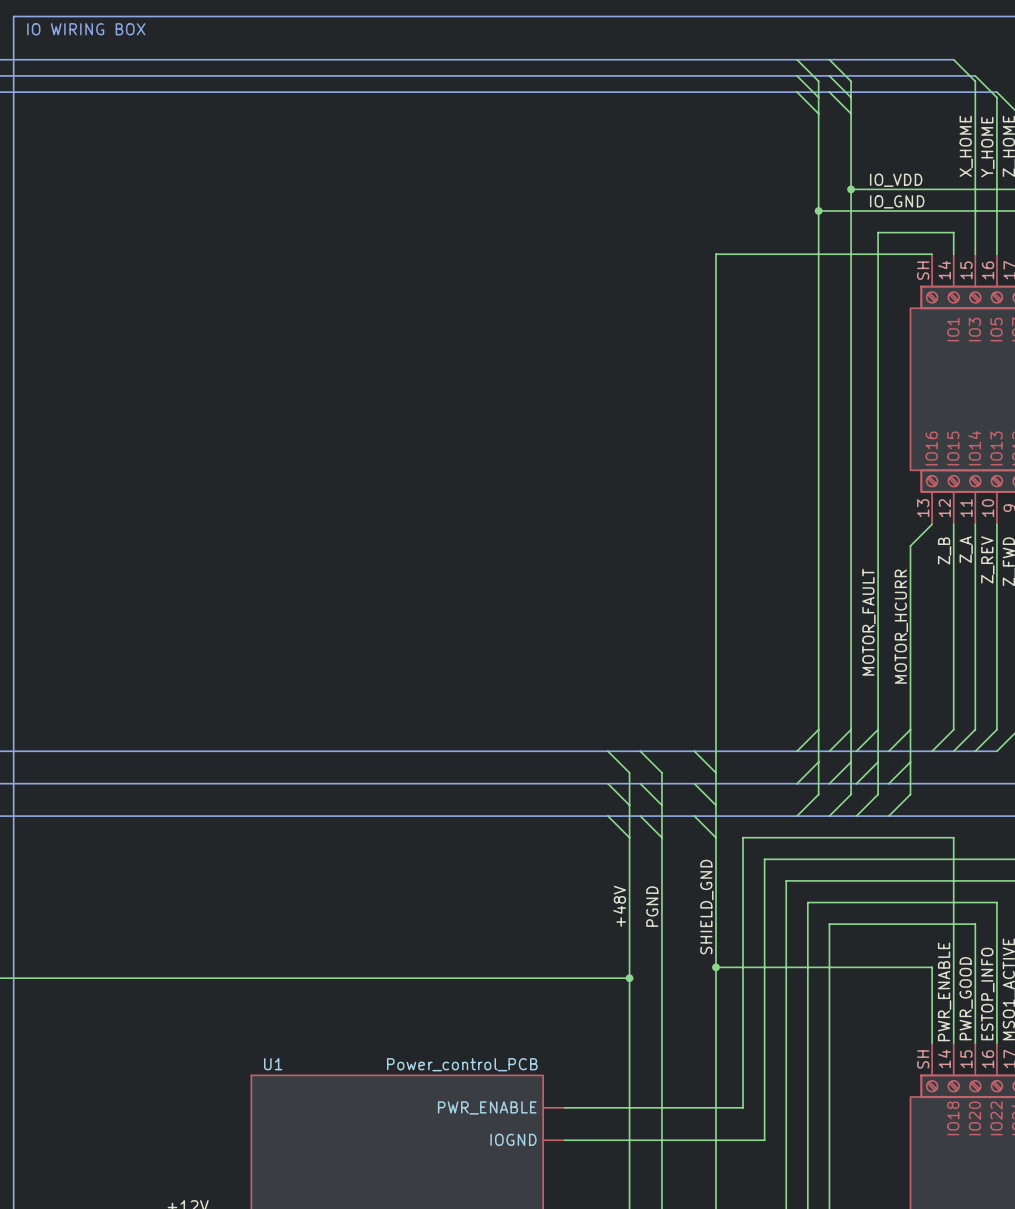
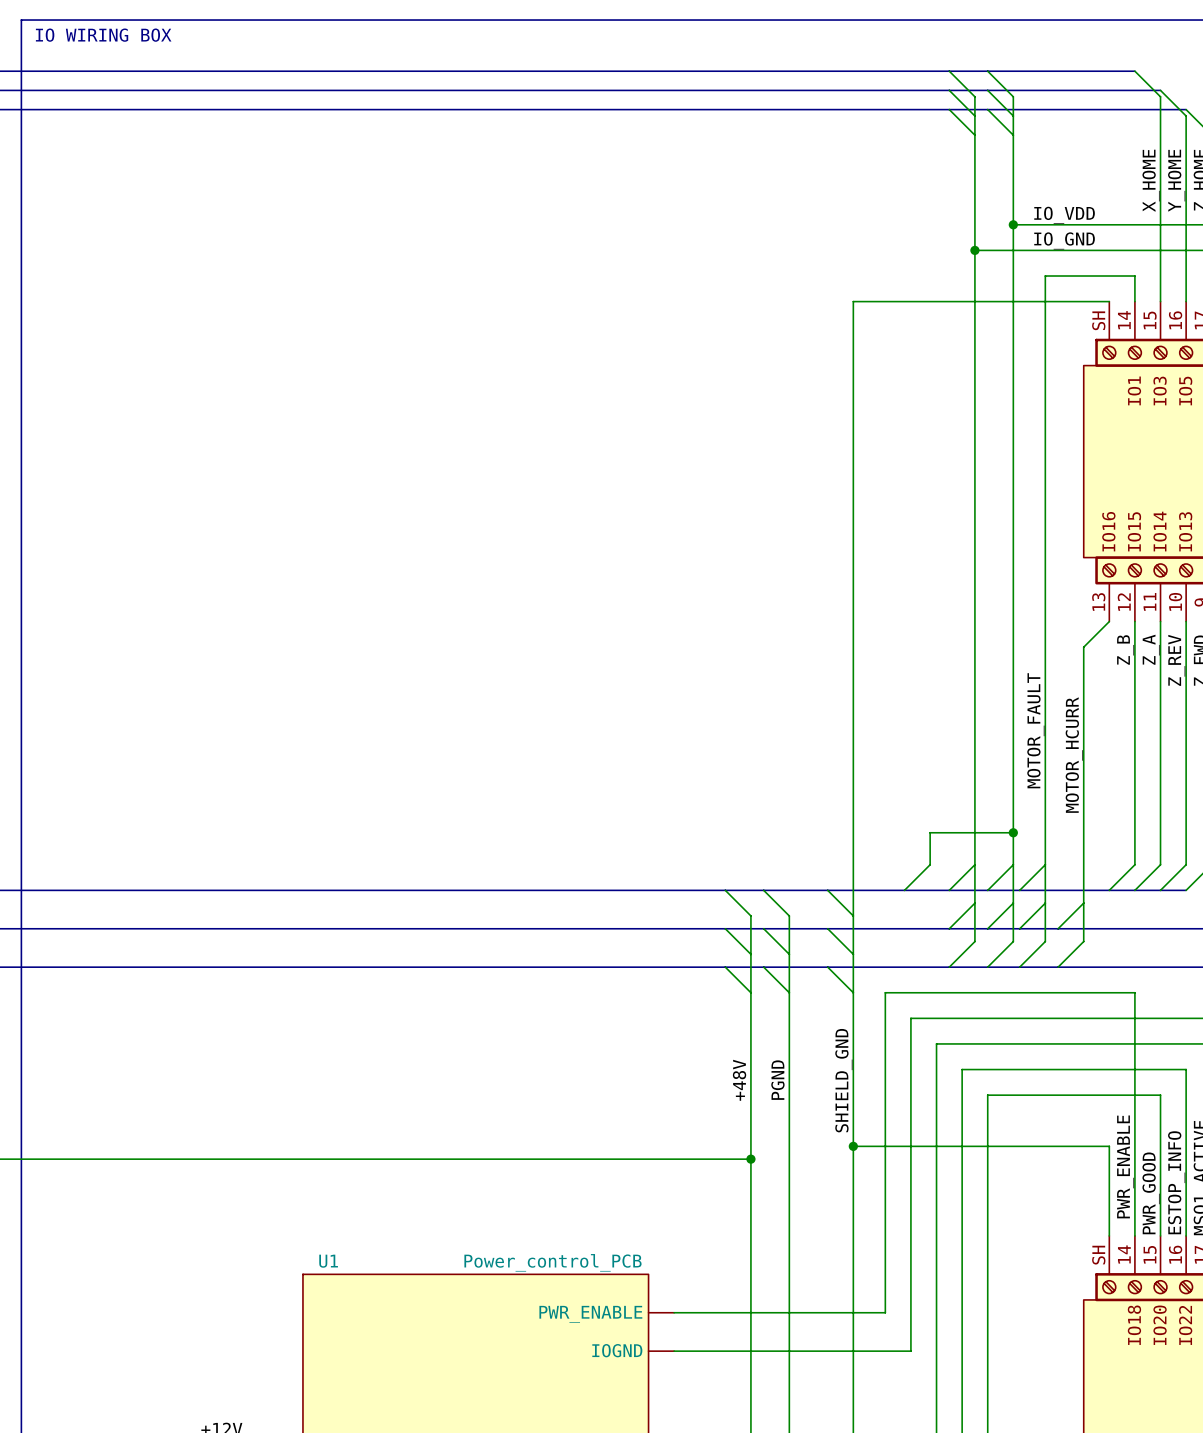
wire: none -> (1013, 832) (930, 832) (930, 864) (904, 890)
junction: none -> (1013, 832)
wire: (910, 729) (888, 751) -> none

